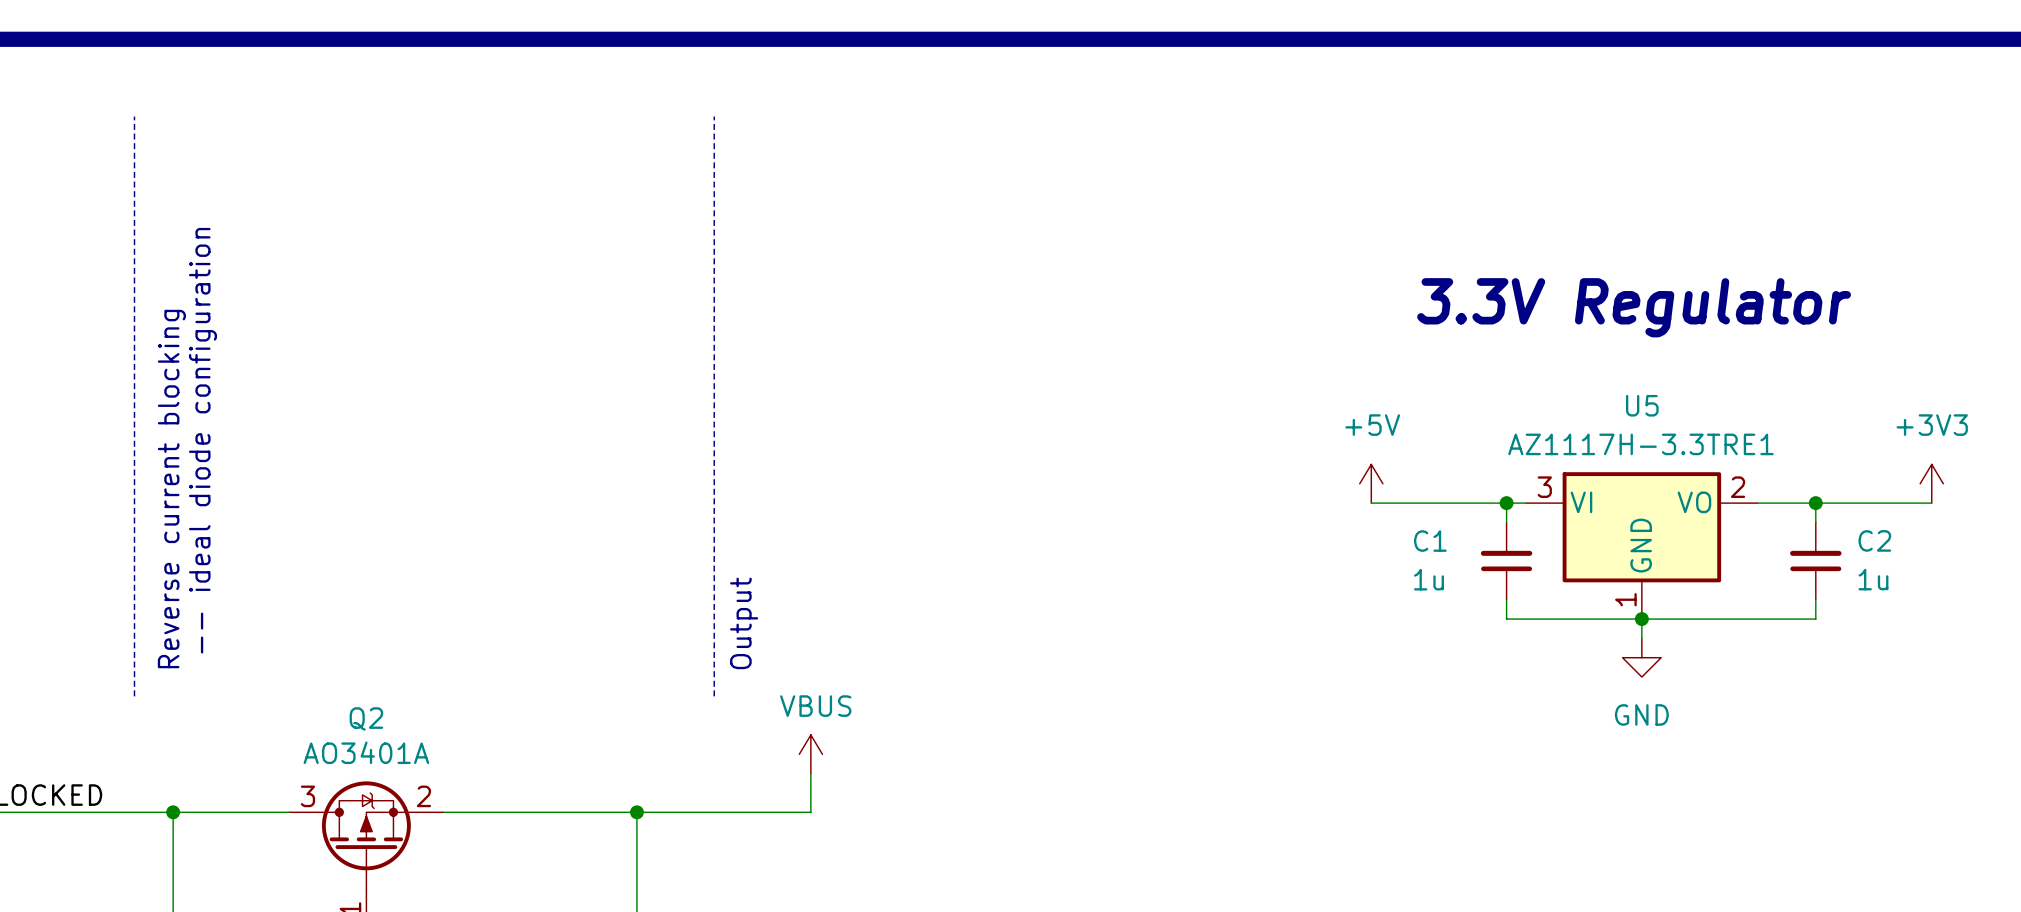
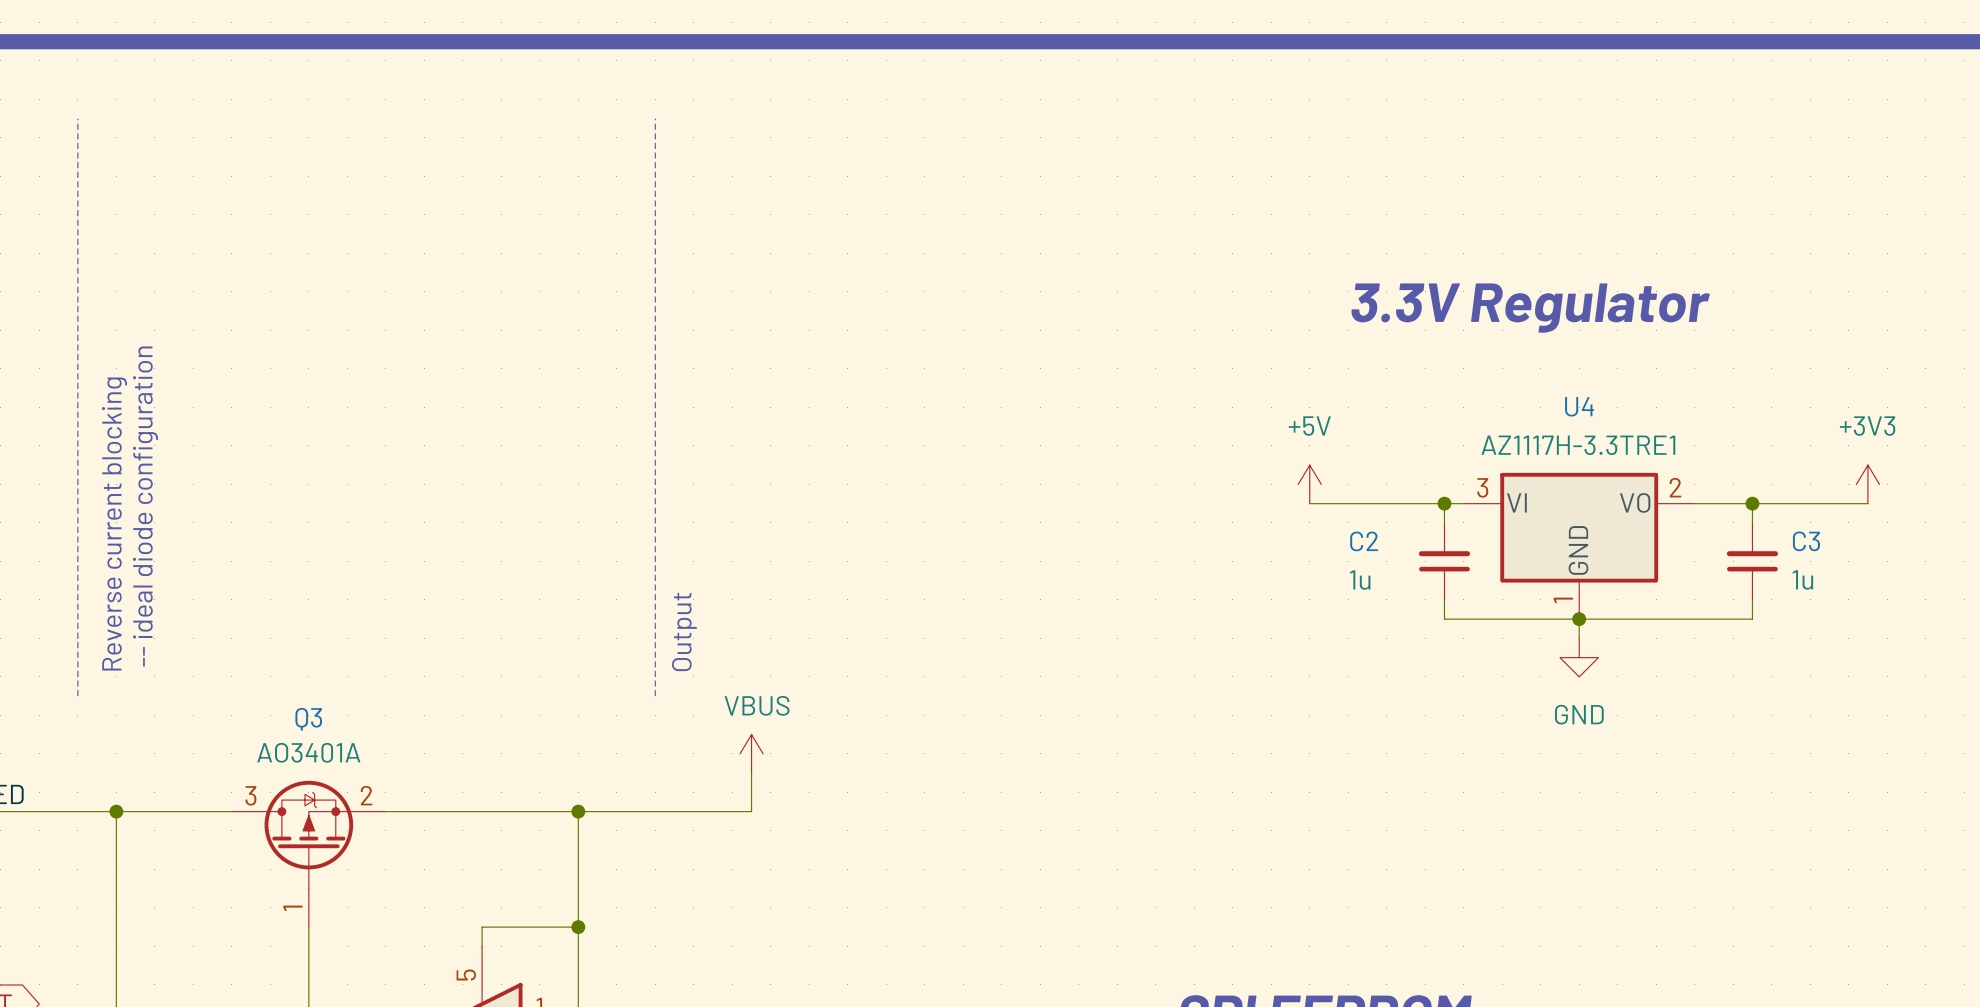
U5 name: U5 (1642, 405) -> U4 (1579, 406)
C2 name: C2 (1874, 540) -> C3 (1806, 541)
C1 name: C1 (1430, 541) -> C2 (1364, 541)
Q2 name: Q2 (366, 718) -> Q3 (308, 719)

